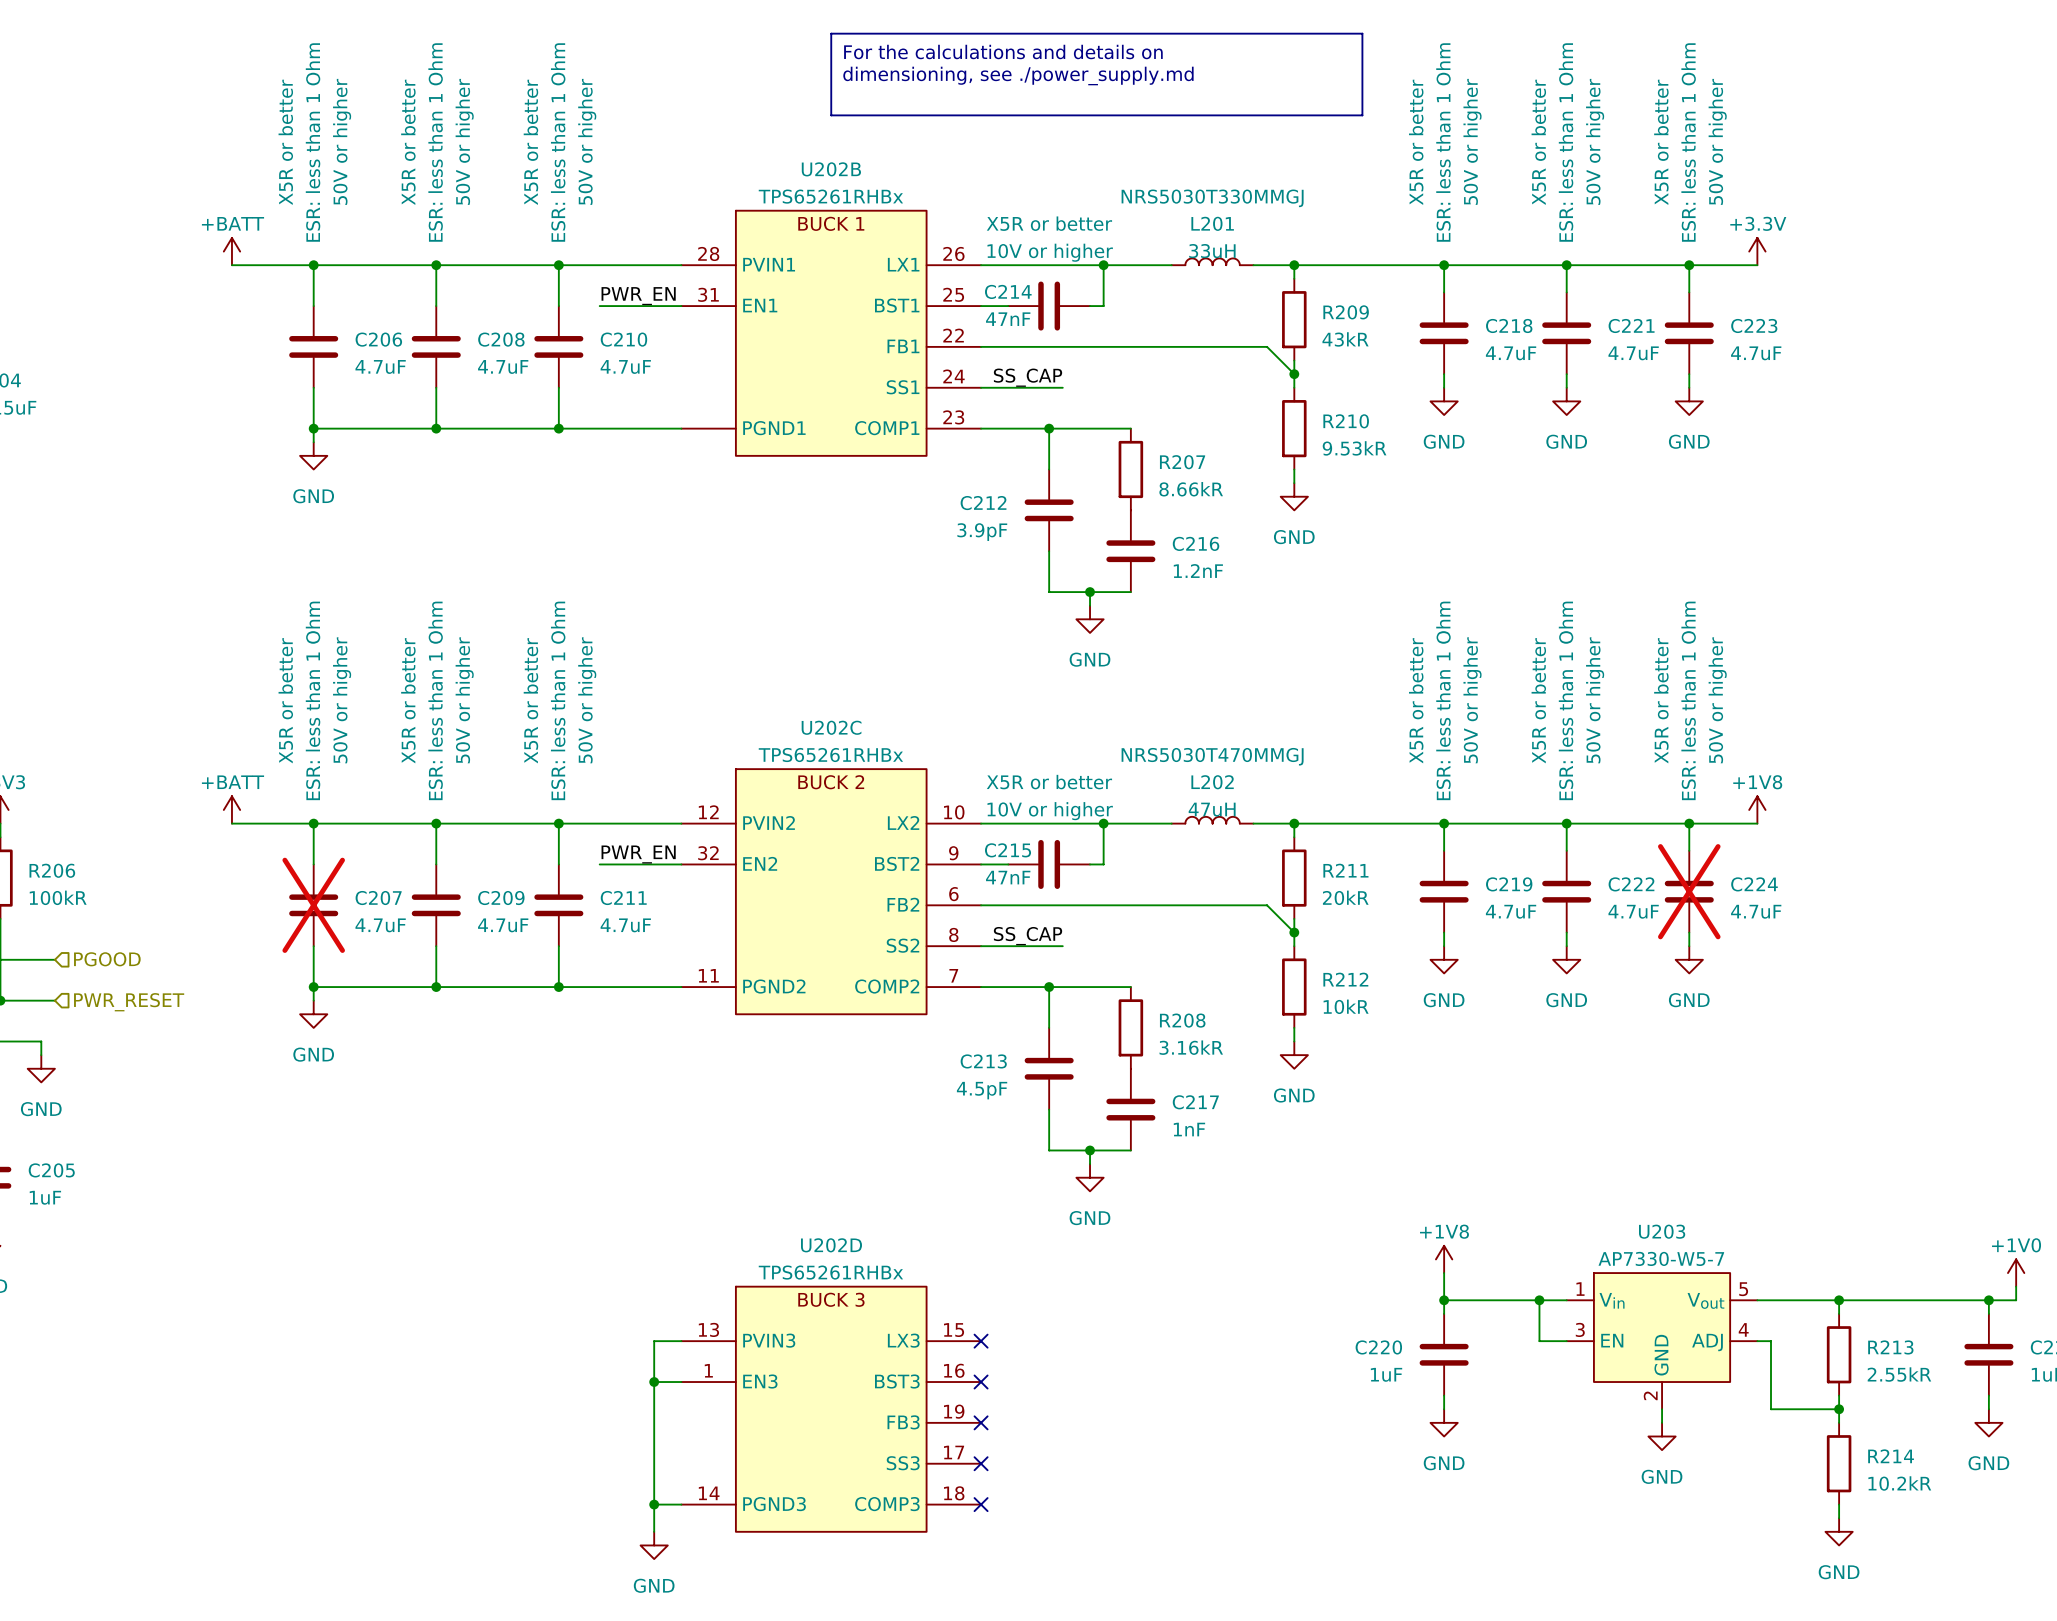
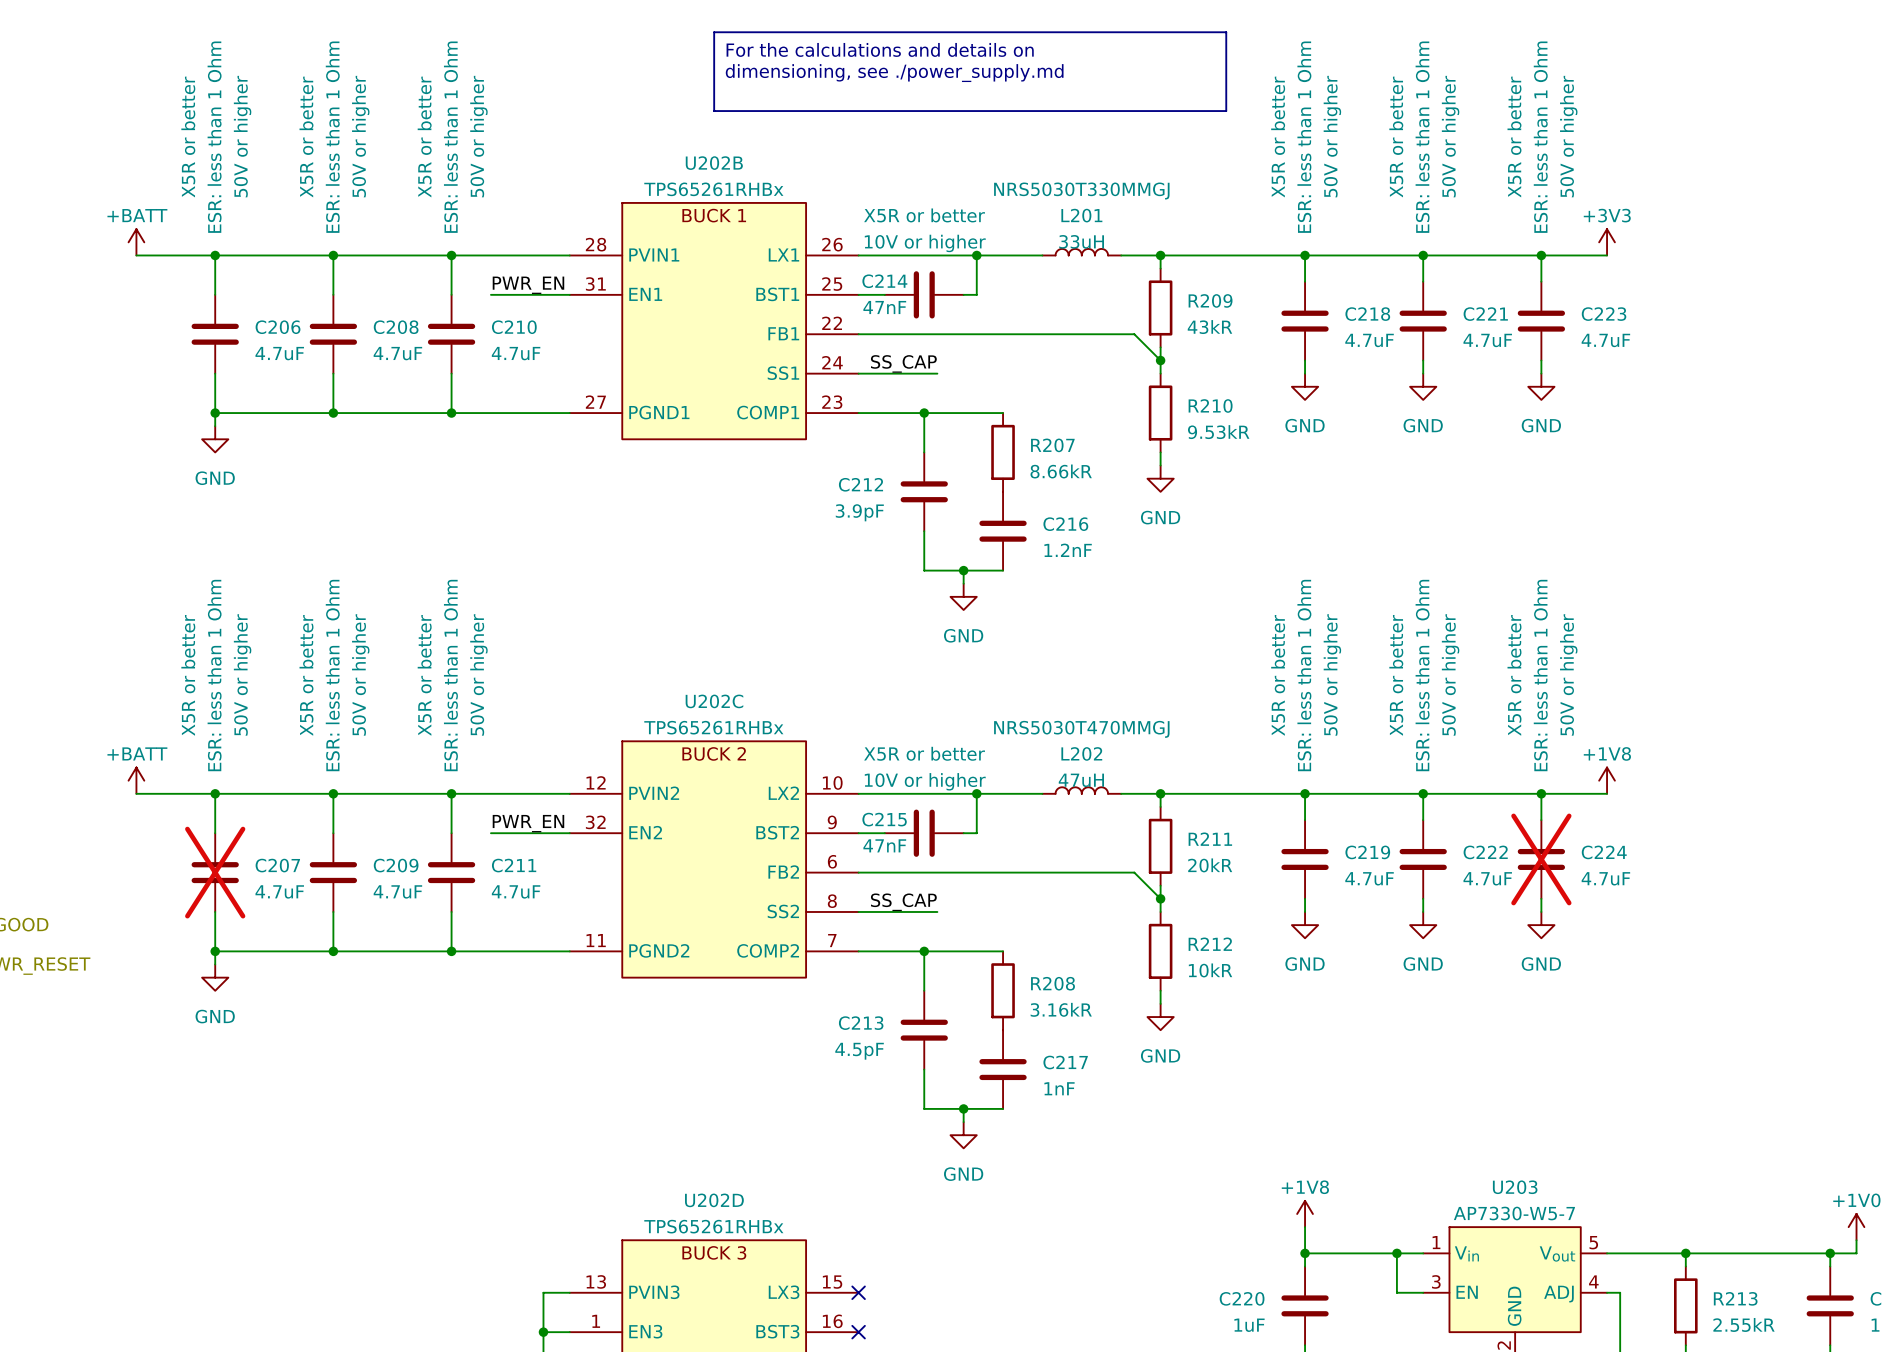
power symbol: +3.3V (1757, 251) -> +3V3 (1607, 242)
U202B pin number: none -> 27 (595, 402)

